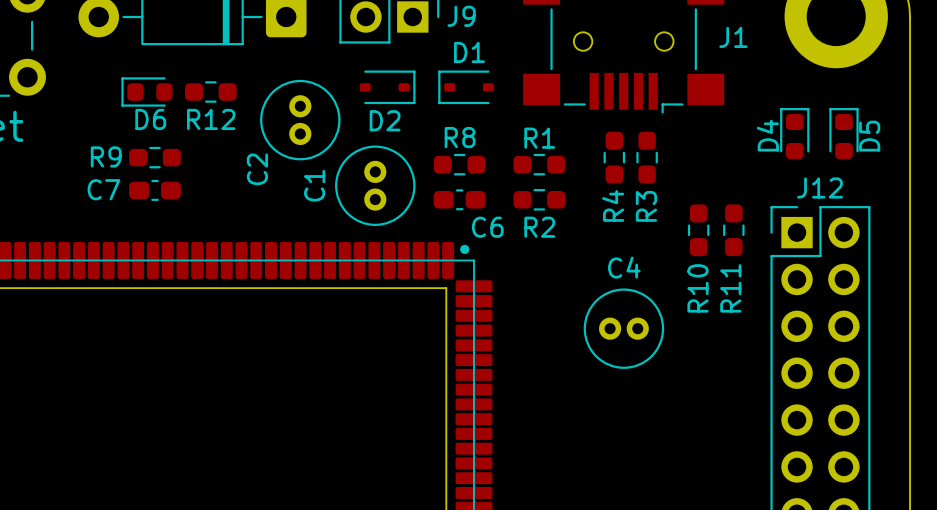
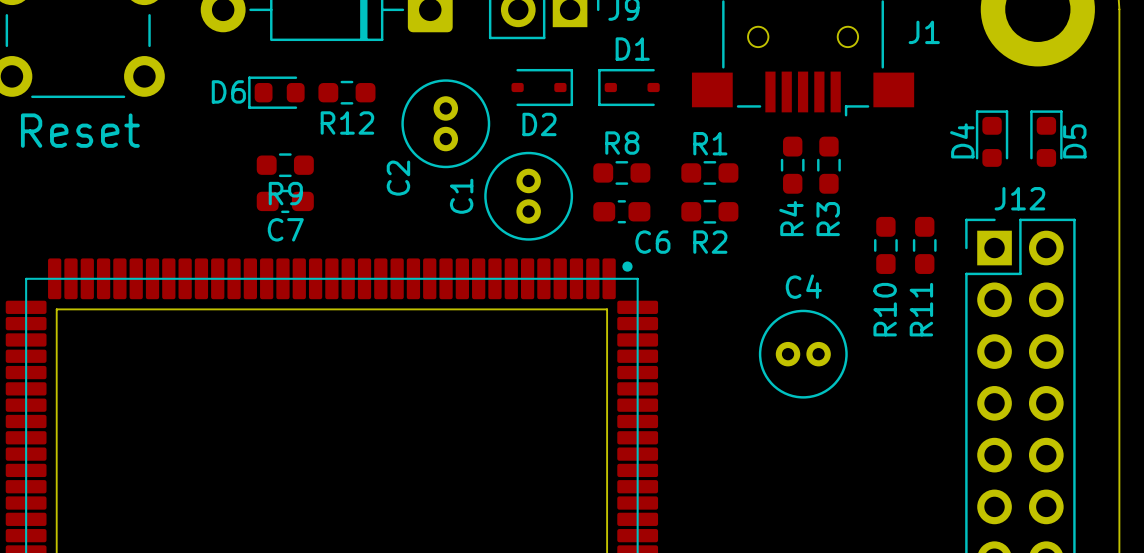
D6 name position: D6 (150, 119) -> D6 (228, 91)
R9 name position: R9 (106, 156) -> R9 (285, 193)
C7 name position: C7 (103, 189) -> C7 (285, 229)

